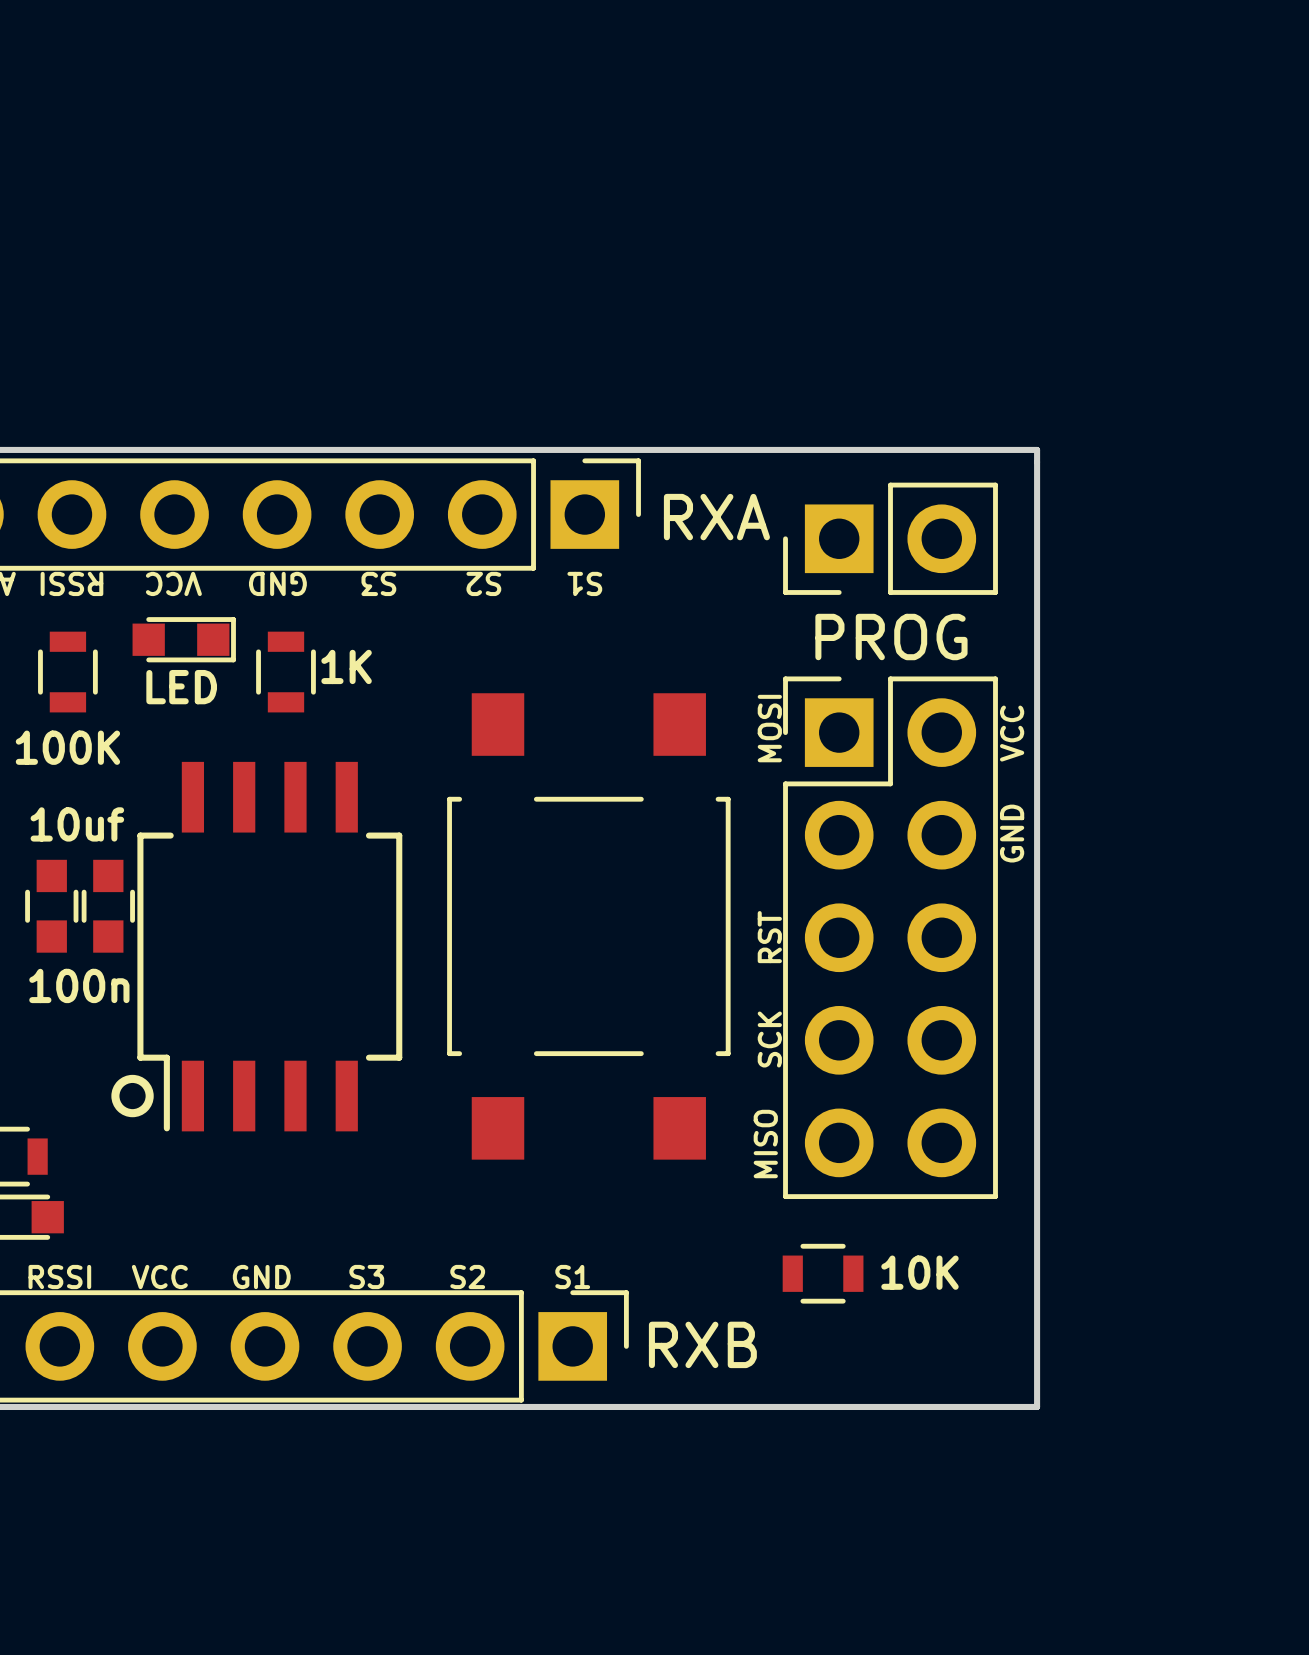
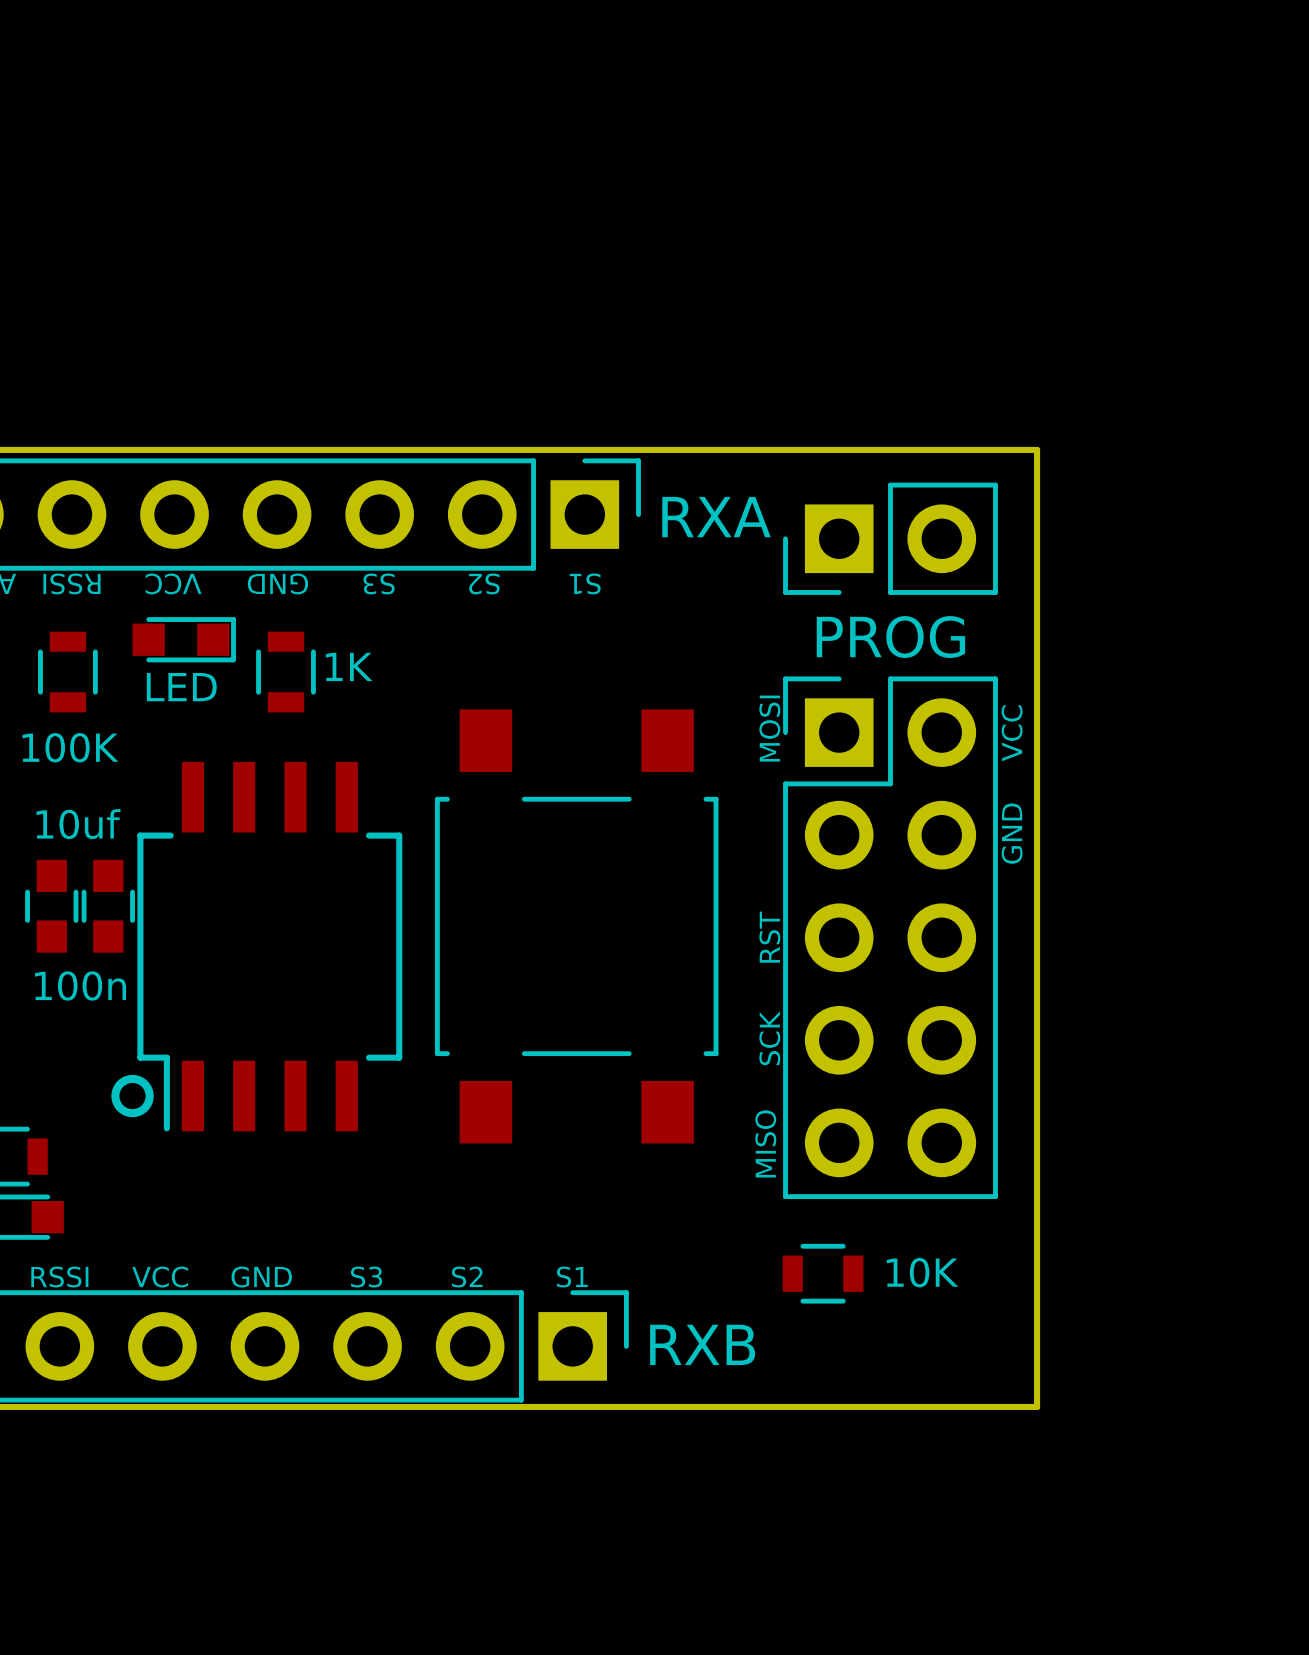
part footprint: [447, 693, 731, 1160] -> [435, 709, 719, 1144]

